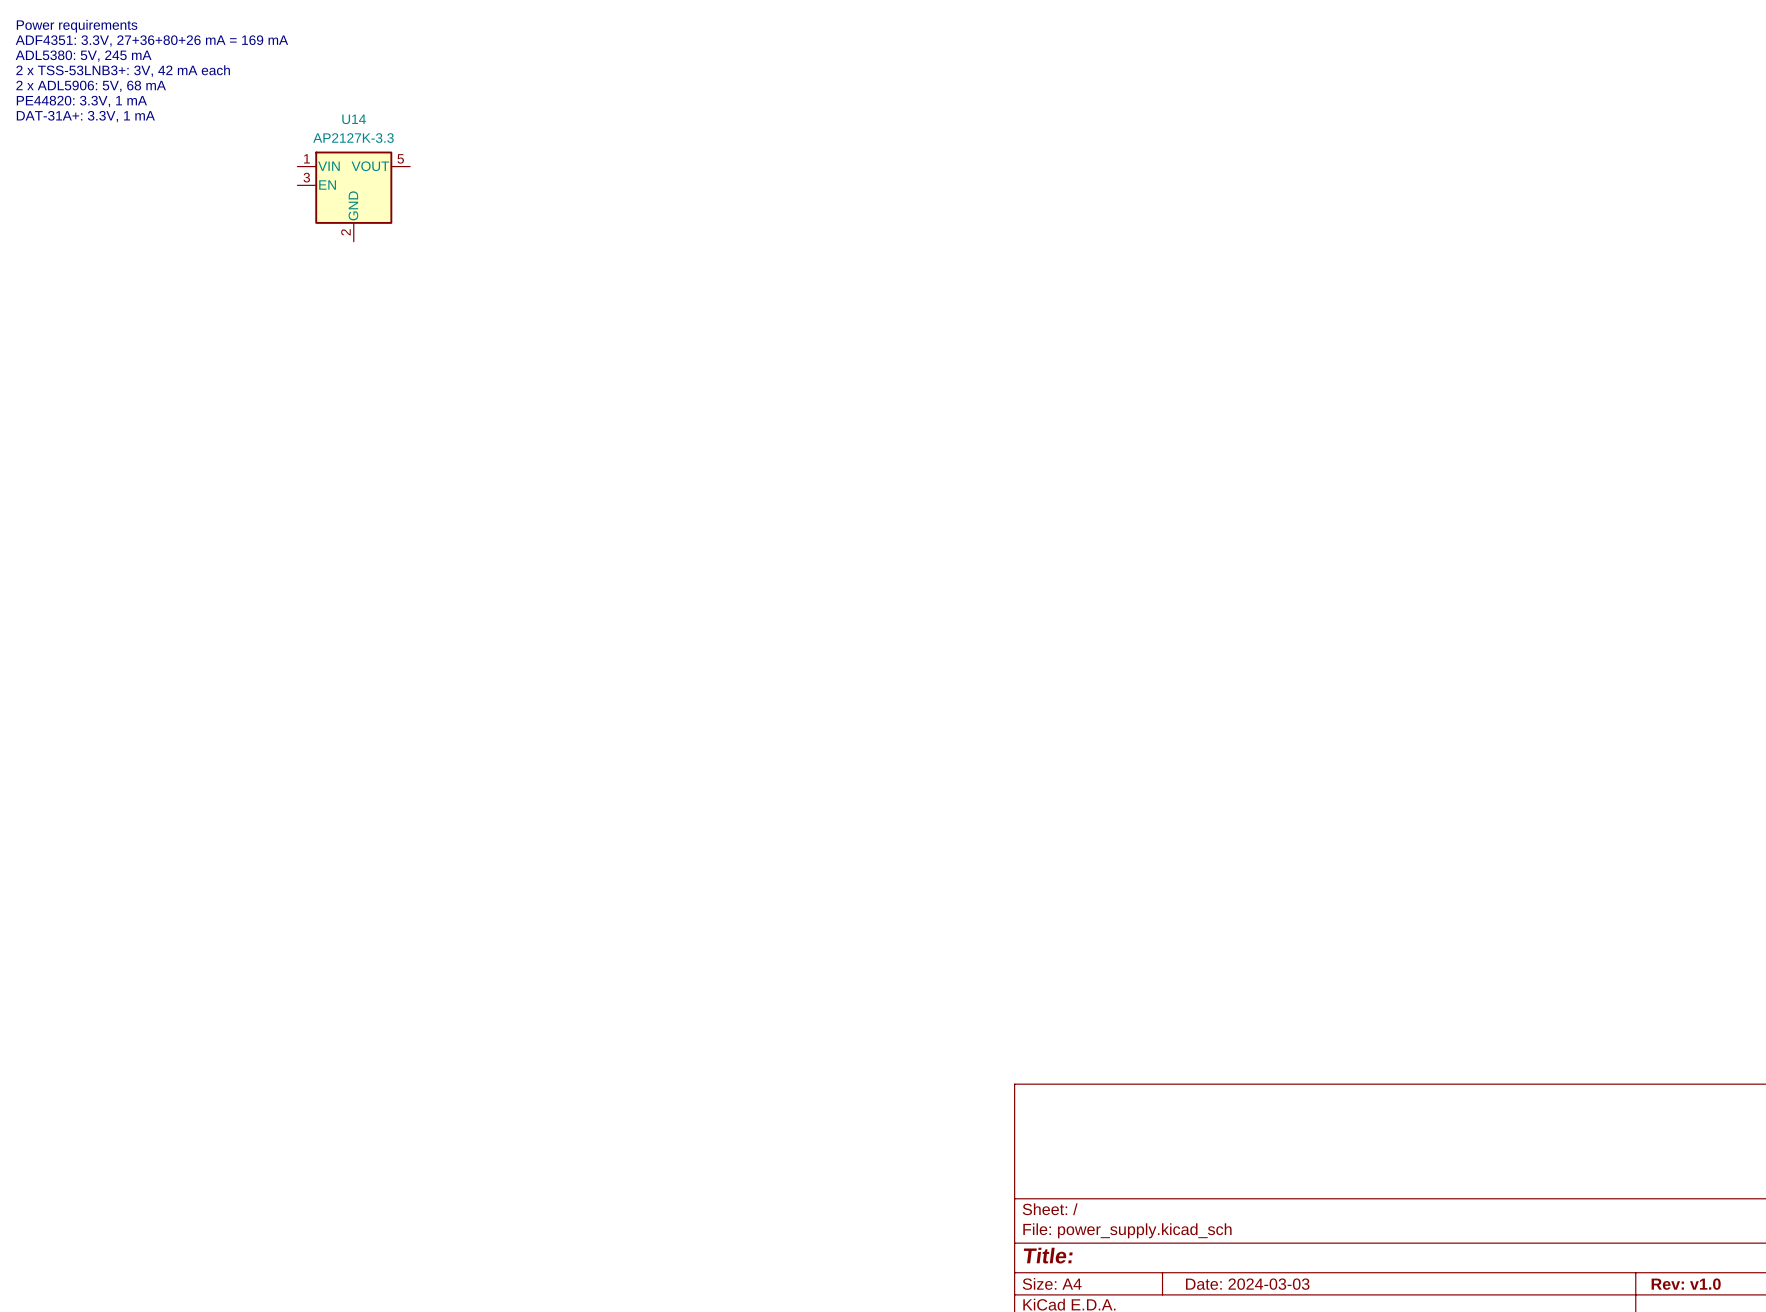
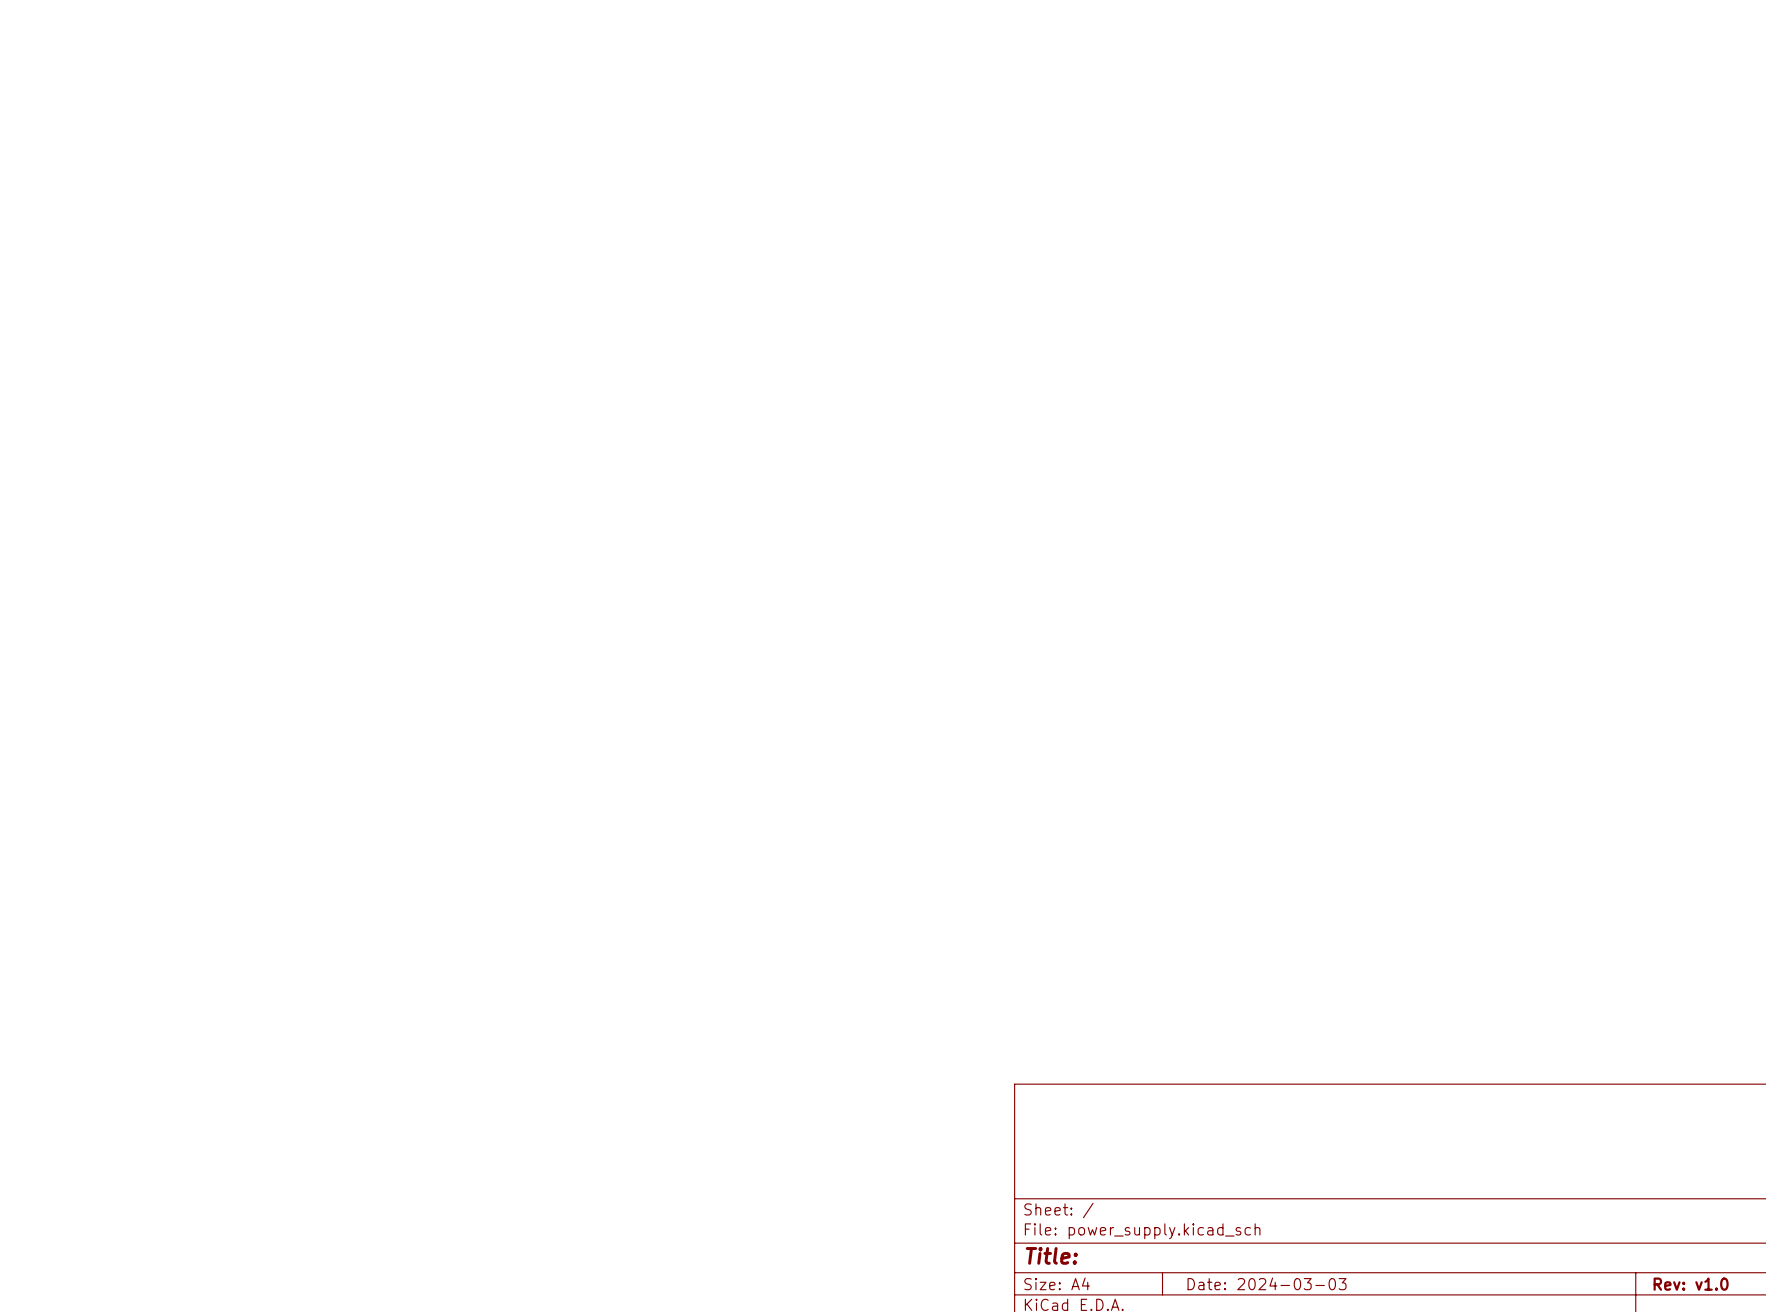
text: Power requirements (77, 26) -> none
text: ADF4351: 3.3V, 27+36+80+26 mA = 169 mA (151, 40) -> none
text: ADL5380: 5V, 245 mA (83, 56) -> none
text: 2 x TSS-53LNB3+: 3V, 42 mA each (123, 71) -> none
text: 2 x ADL5906: 5V, 68 mA (91, 86) -> none
text: PE44820: 3.3V, 1 mA (81, 101) -> none
text: DAT-31A+: 3.3V, 1 mA (85, 116) -> none
U14: AP2127K-3.3 (353, 196) -> none

